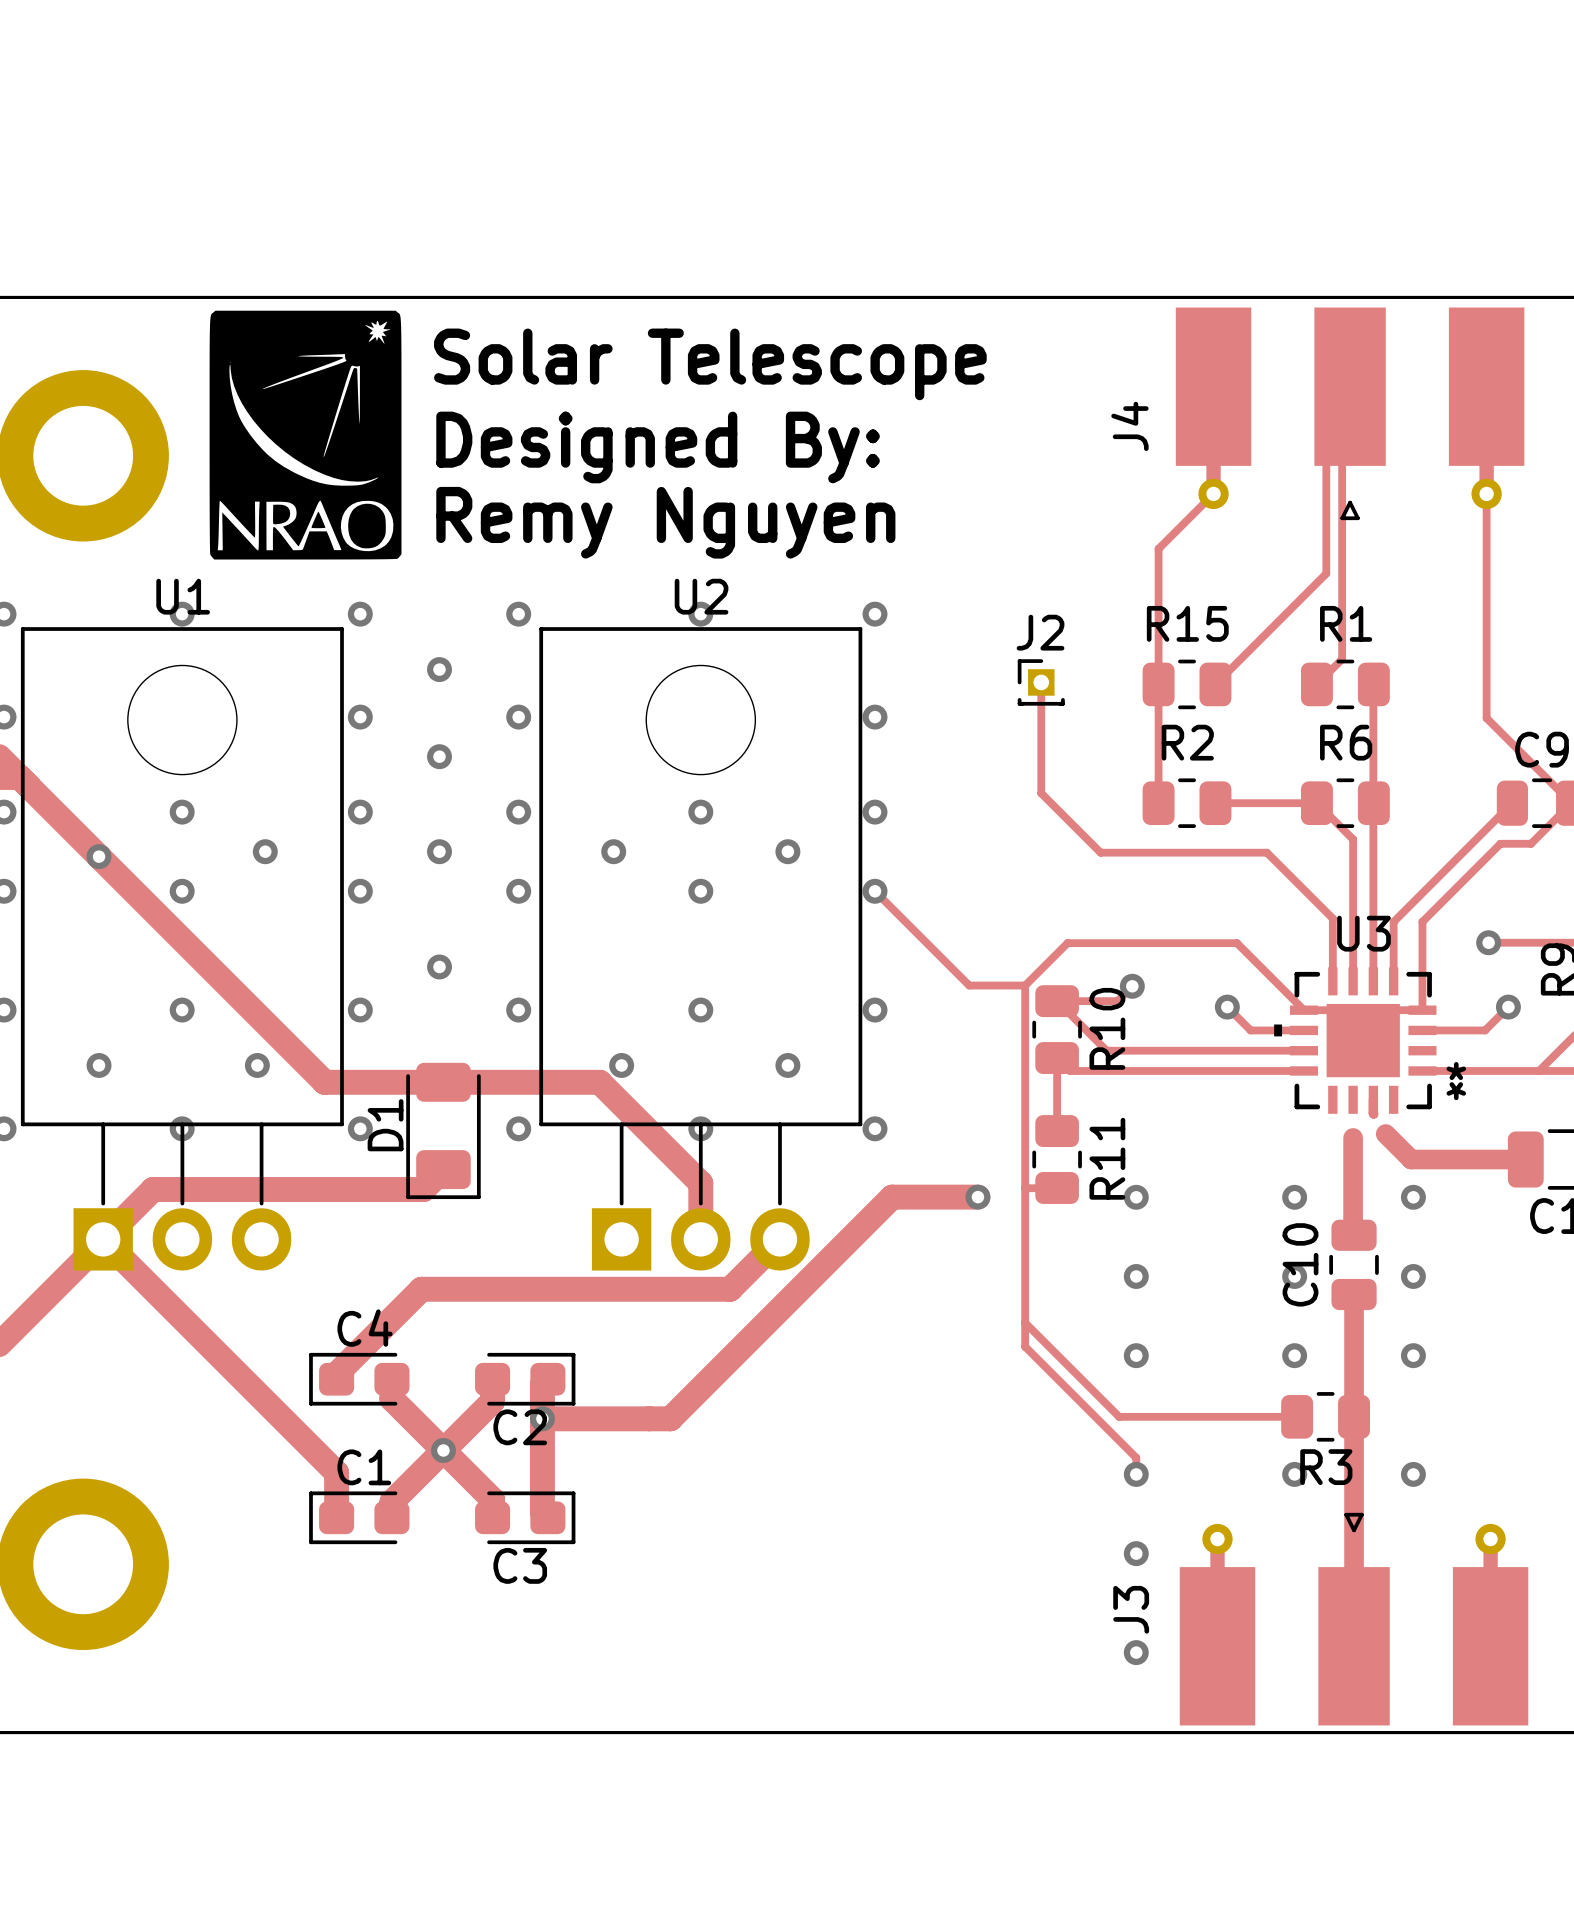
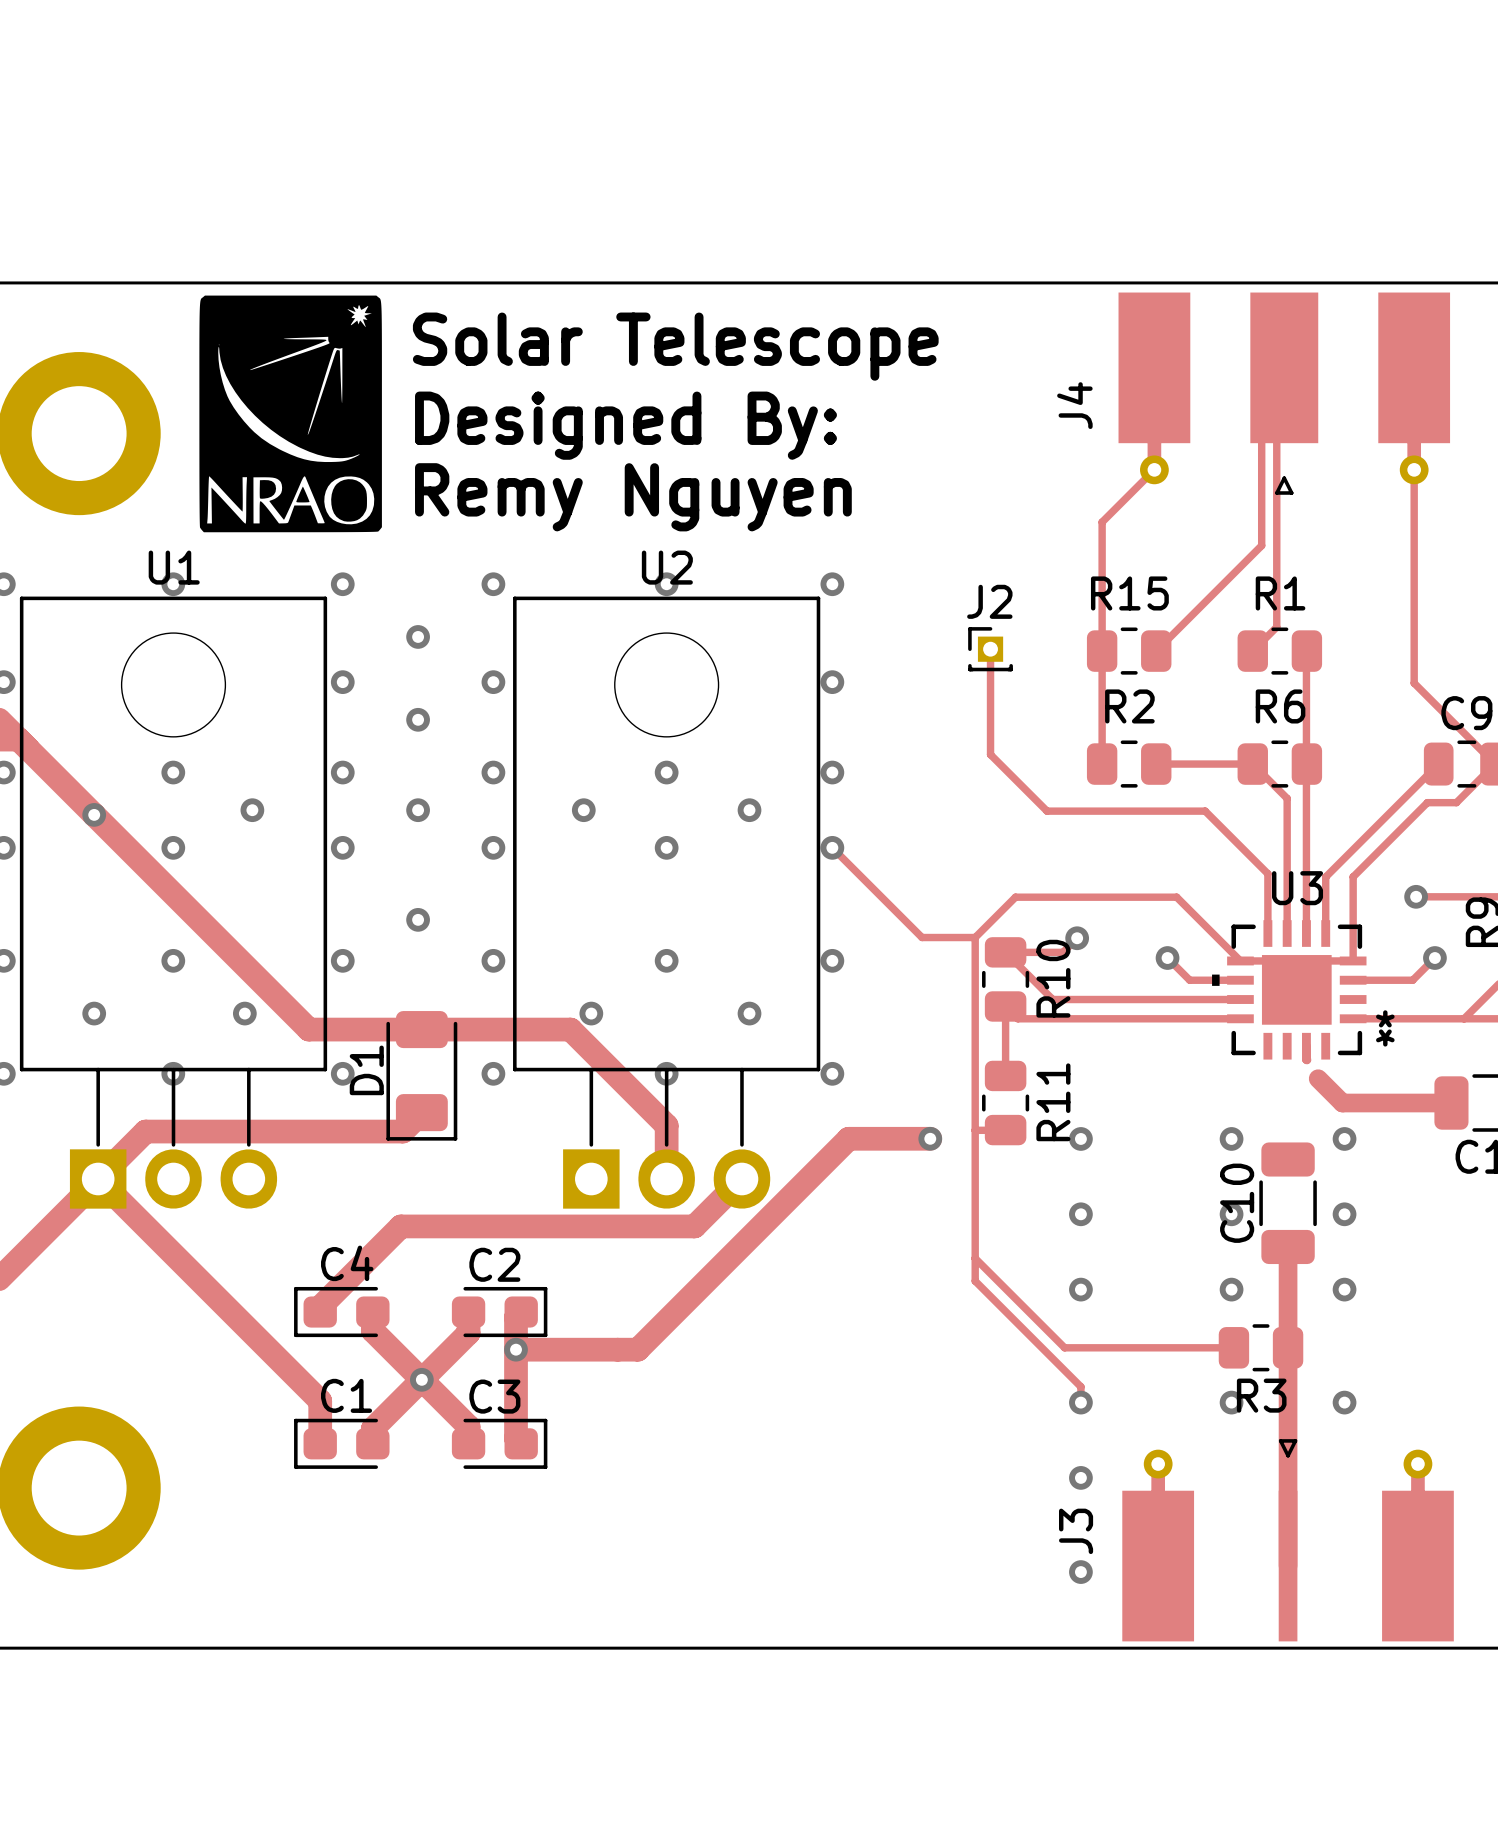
track: (1353, 1137) (1354, 1235) -> none
C10 footprint: [1329, 1219, 1379, 1311] -> [1259, 1142, 1317, 1265]
C2 name position: C2 (520, 1427) -> C2 (494, 1264)
J3 footprint: [1179, 1512, 1529, 1726] -> [1122, 1439, 1454, 1642]
C3 name position: C3 (520, 1565) -> C3 (494, 1396)

